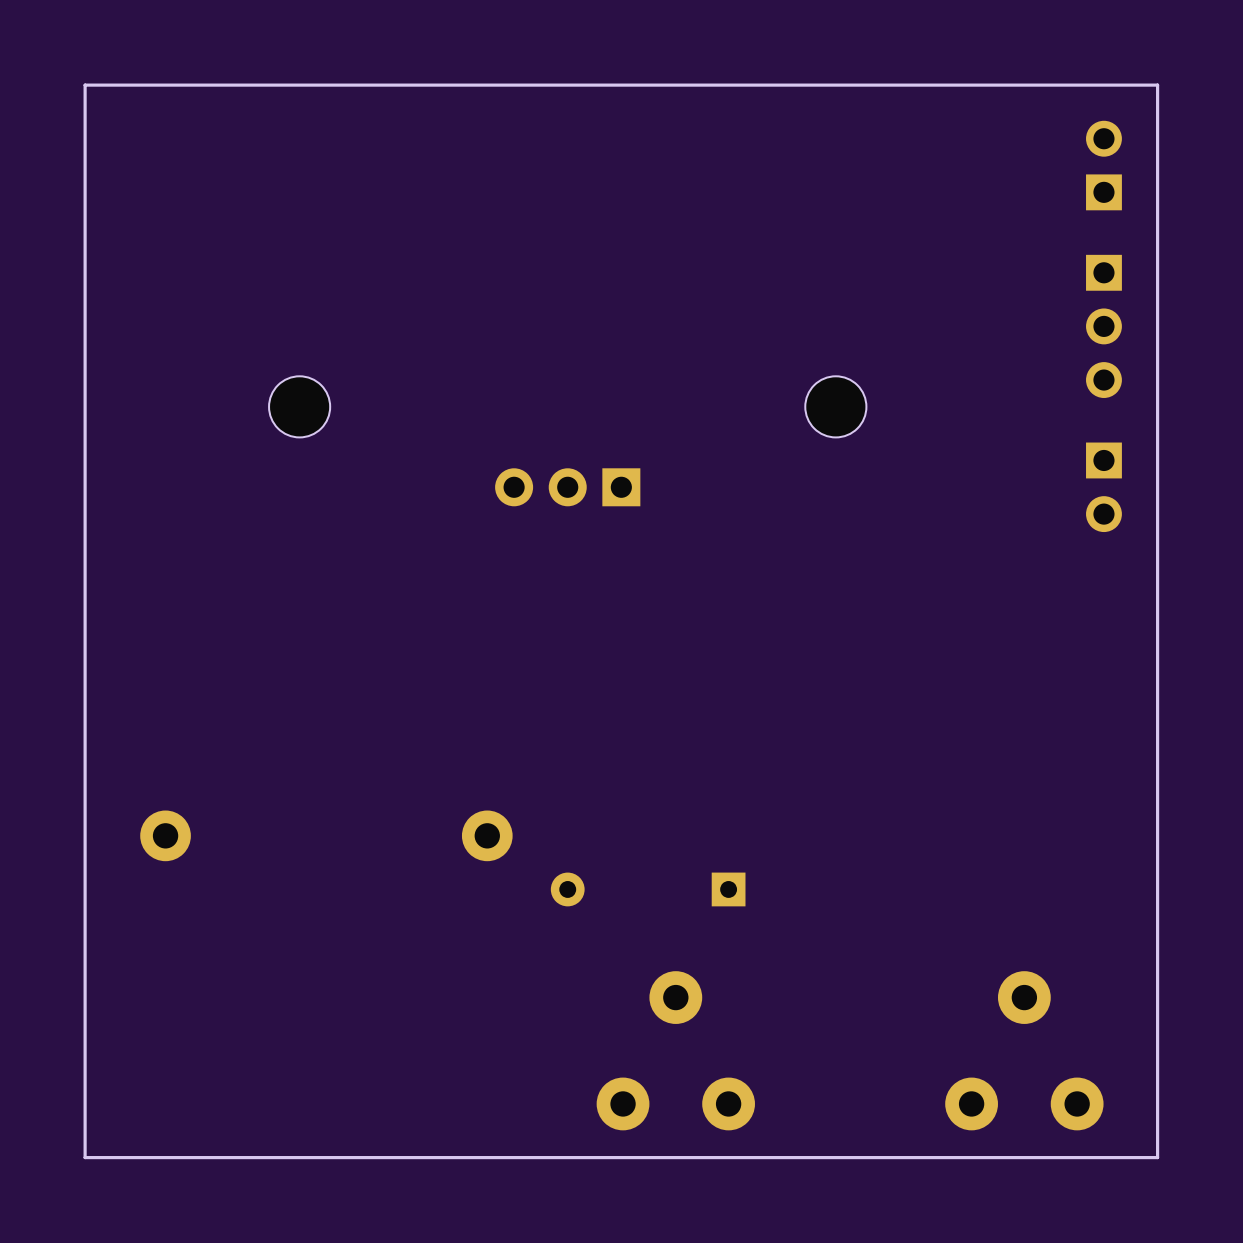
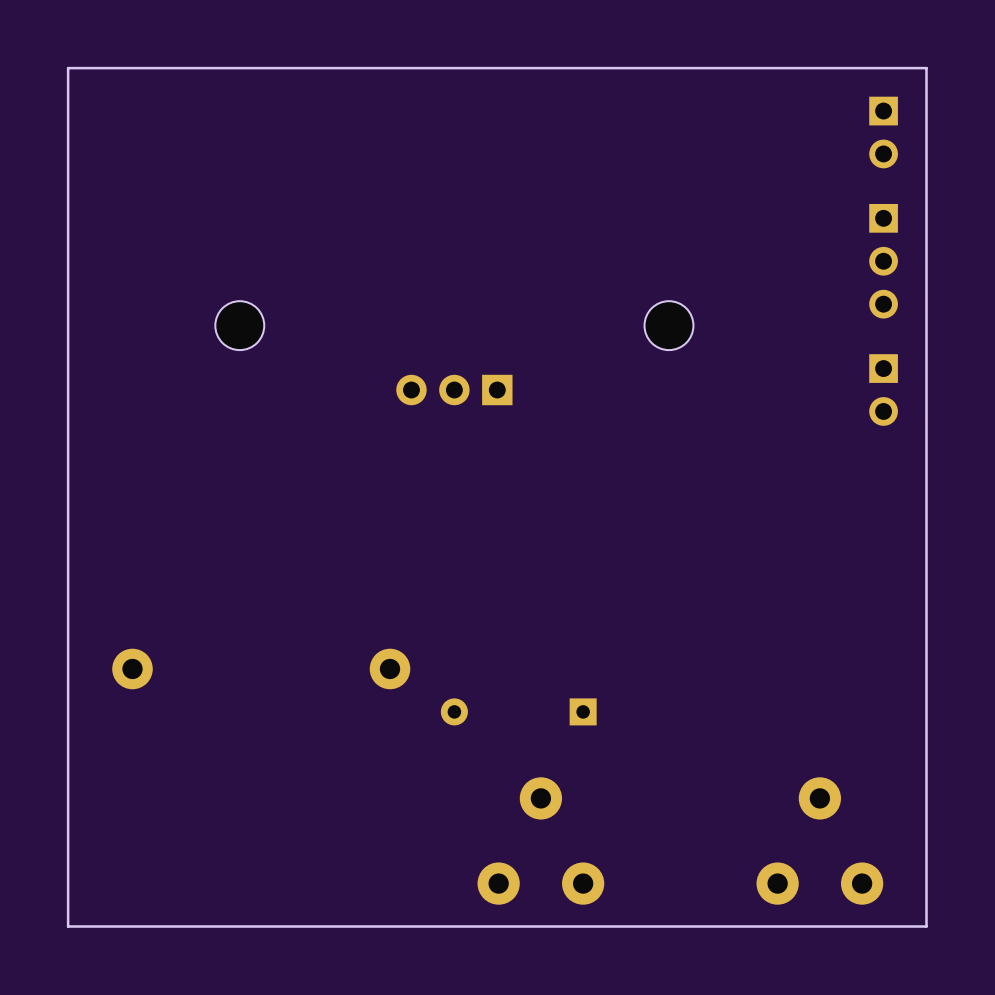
part rotation: 0° (1103, 165) -> 180° (883, 132)

